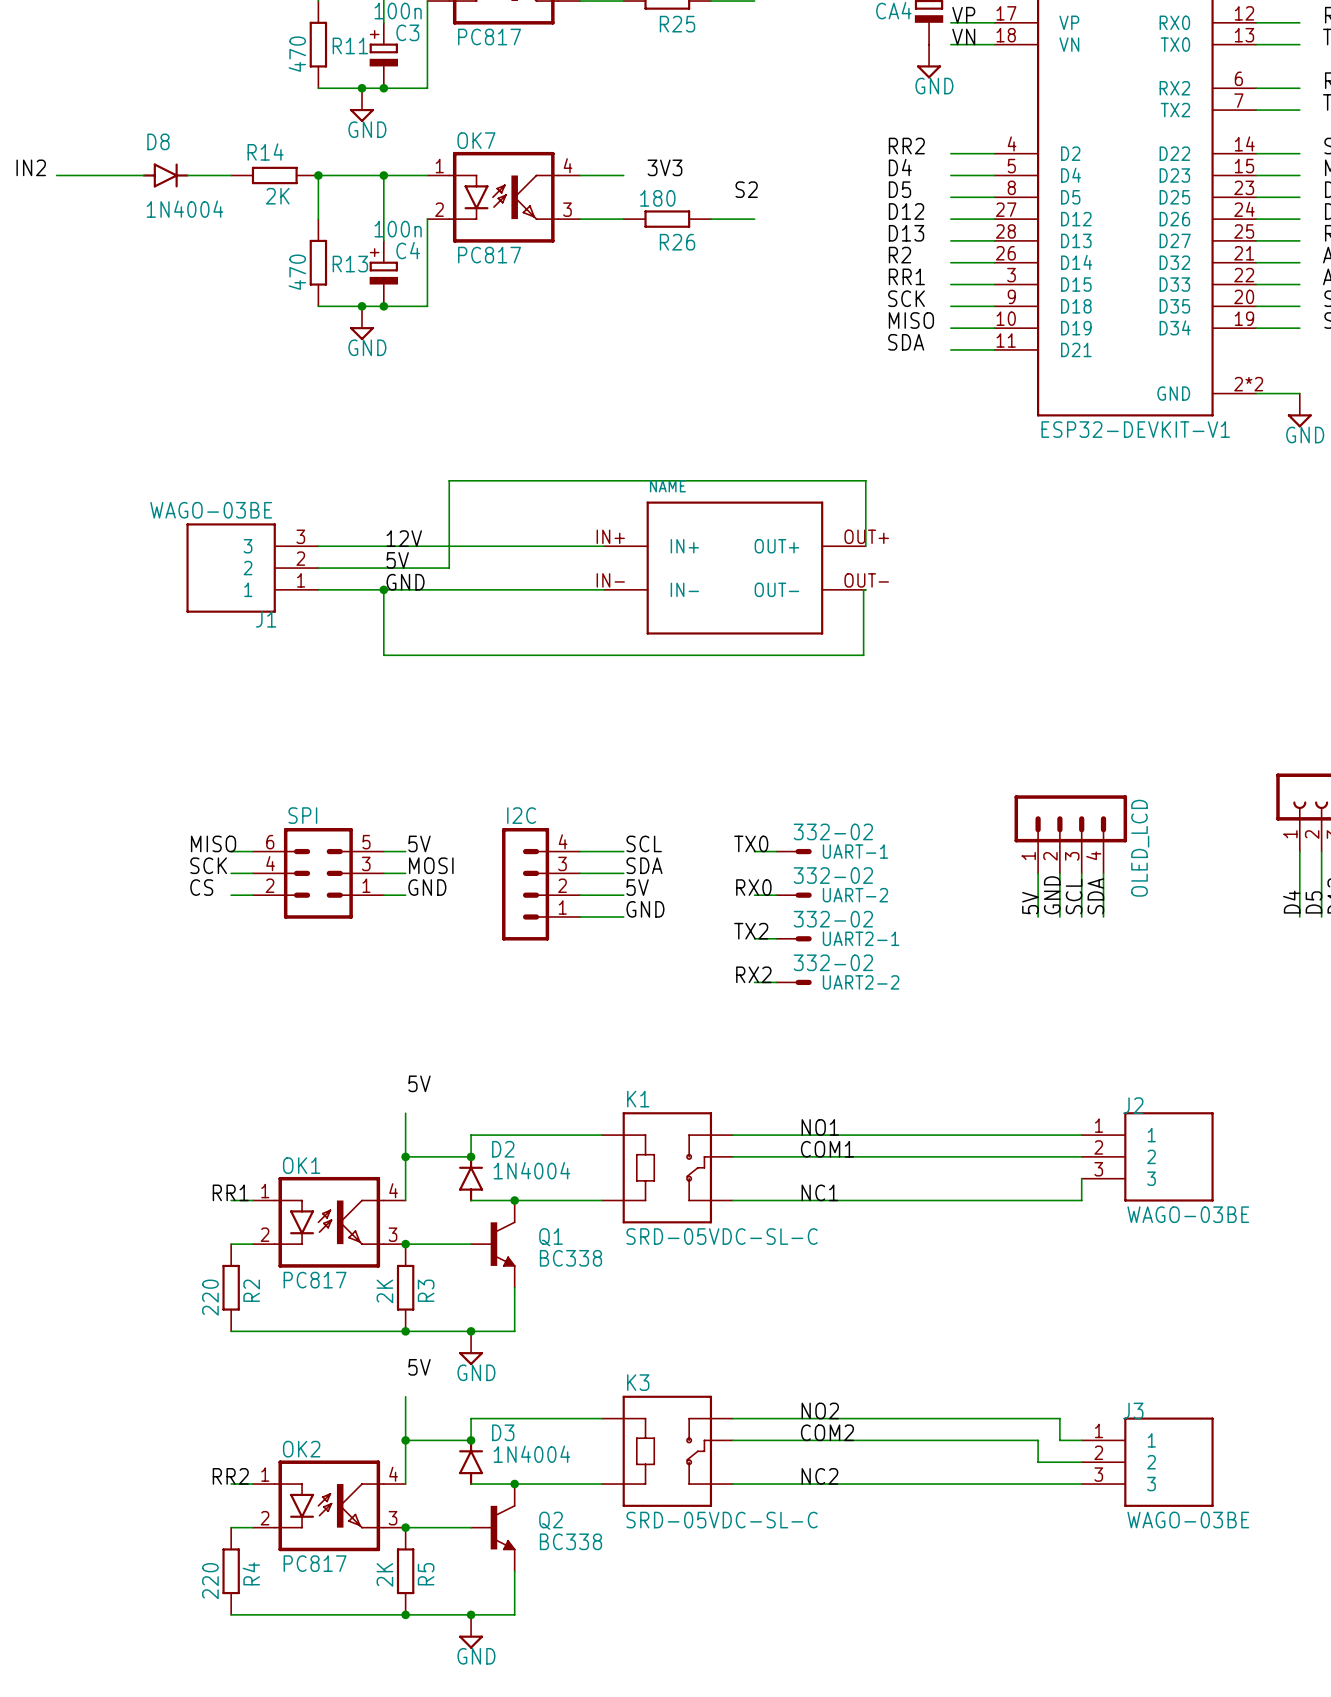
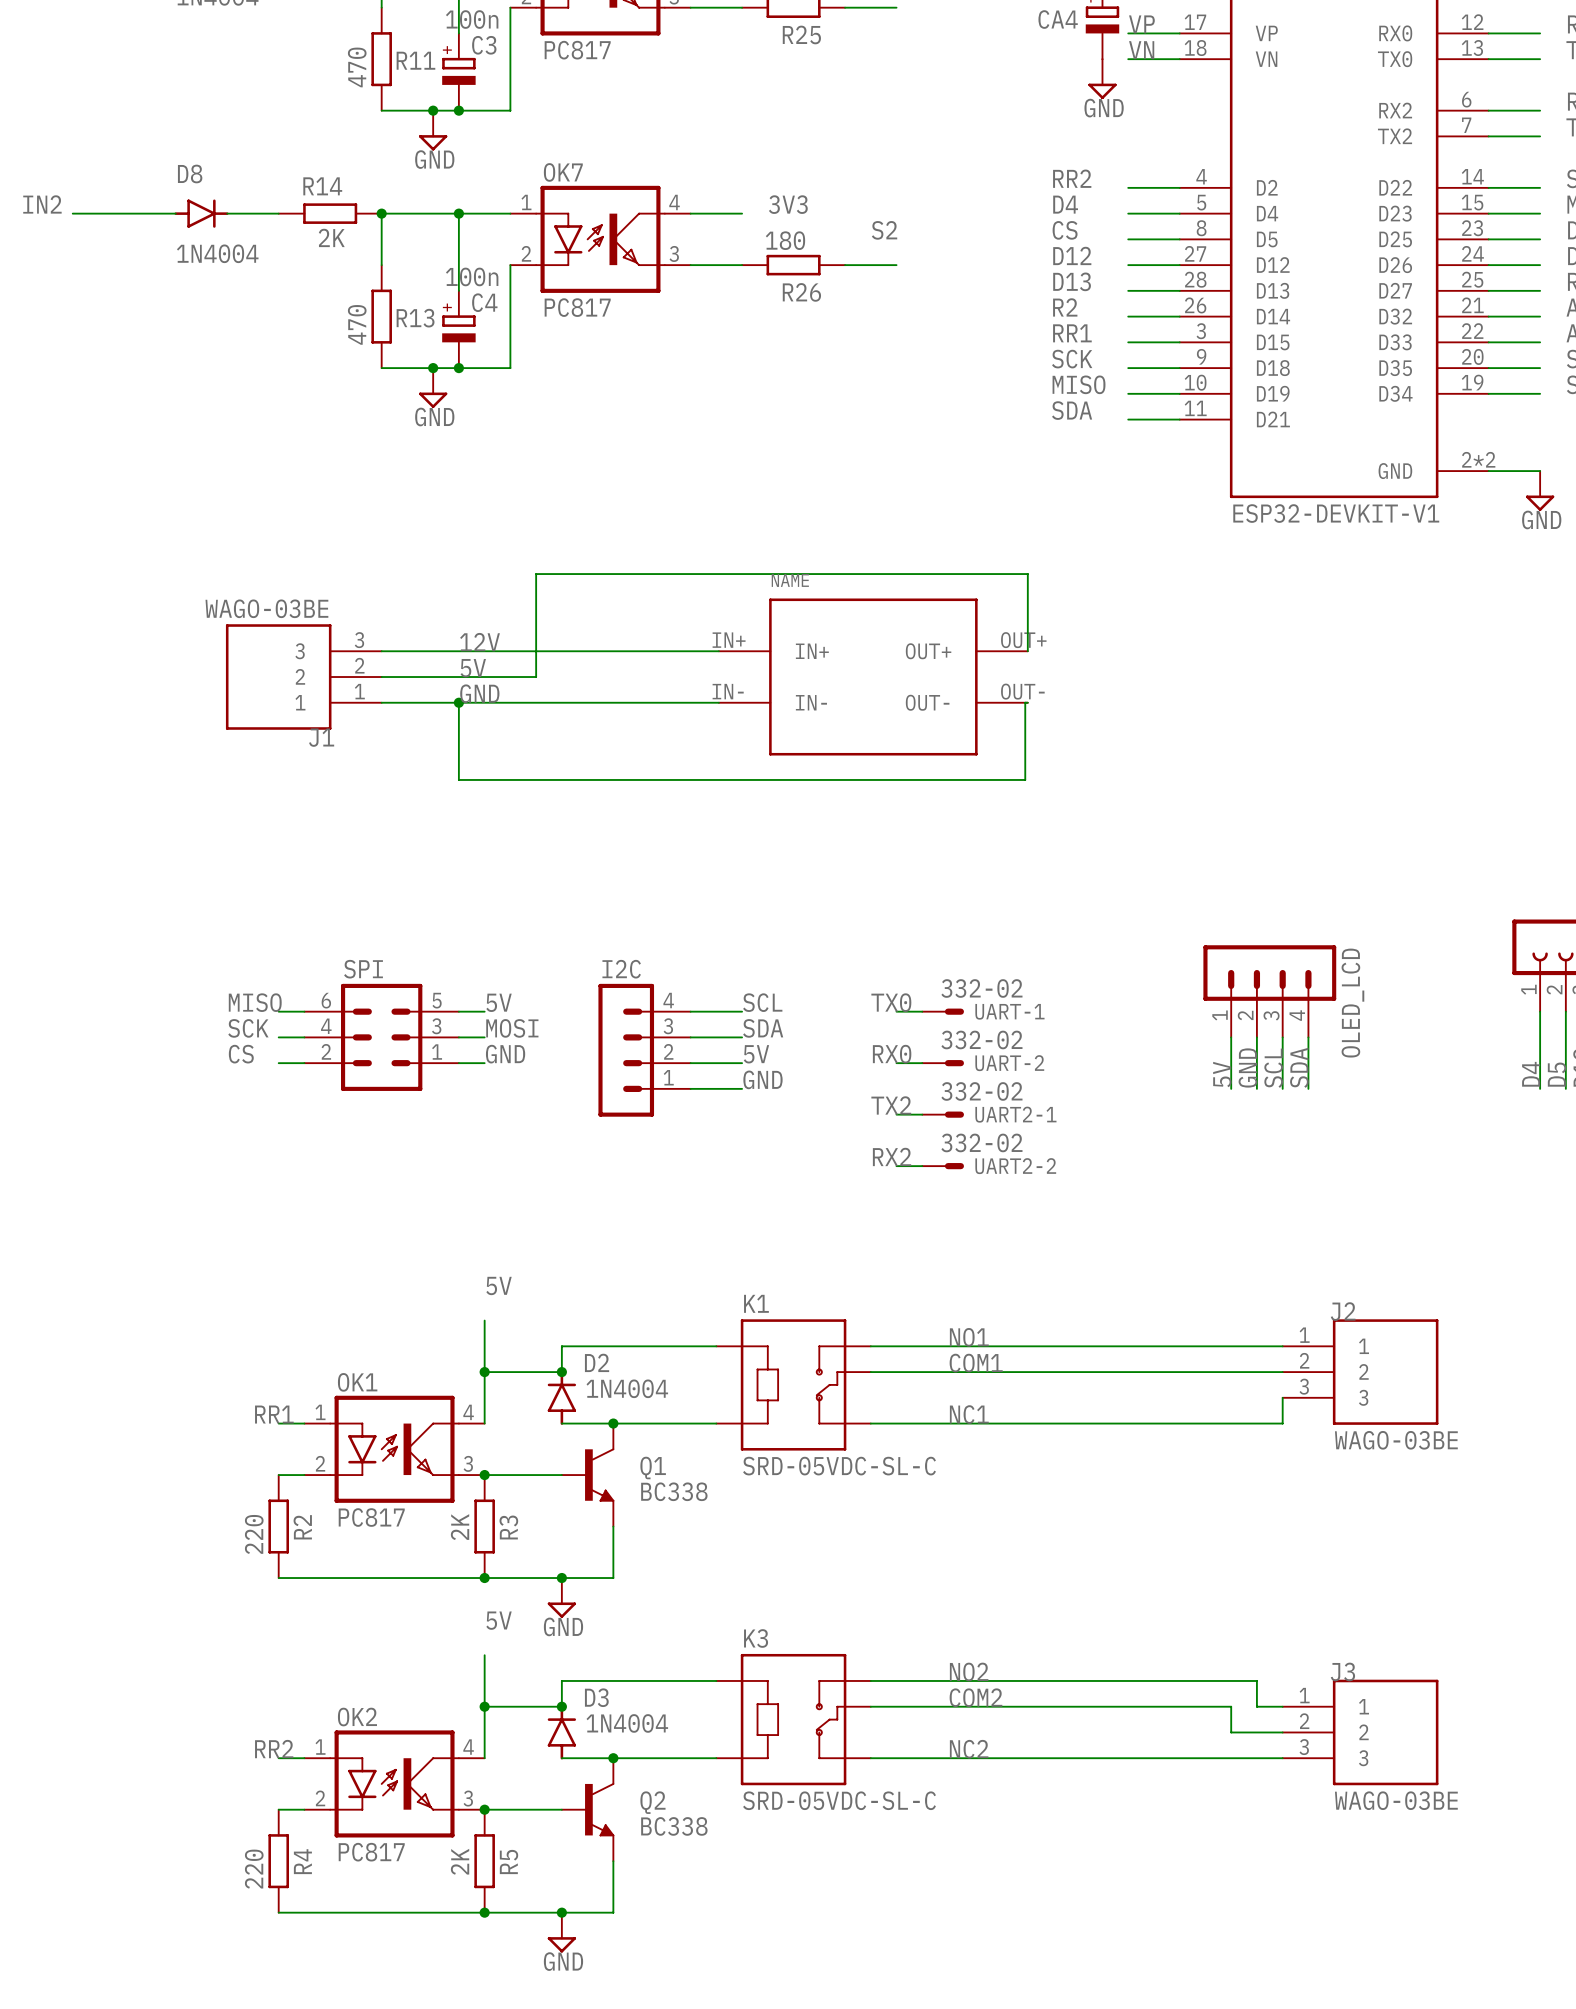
label: D5 (899, 189) -> CS (1065, 230)

